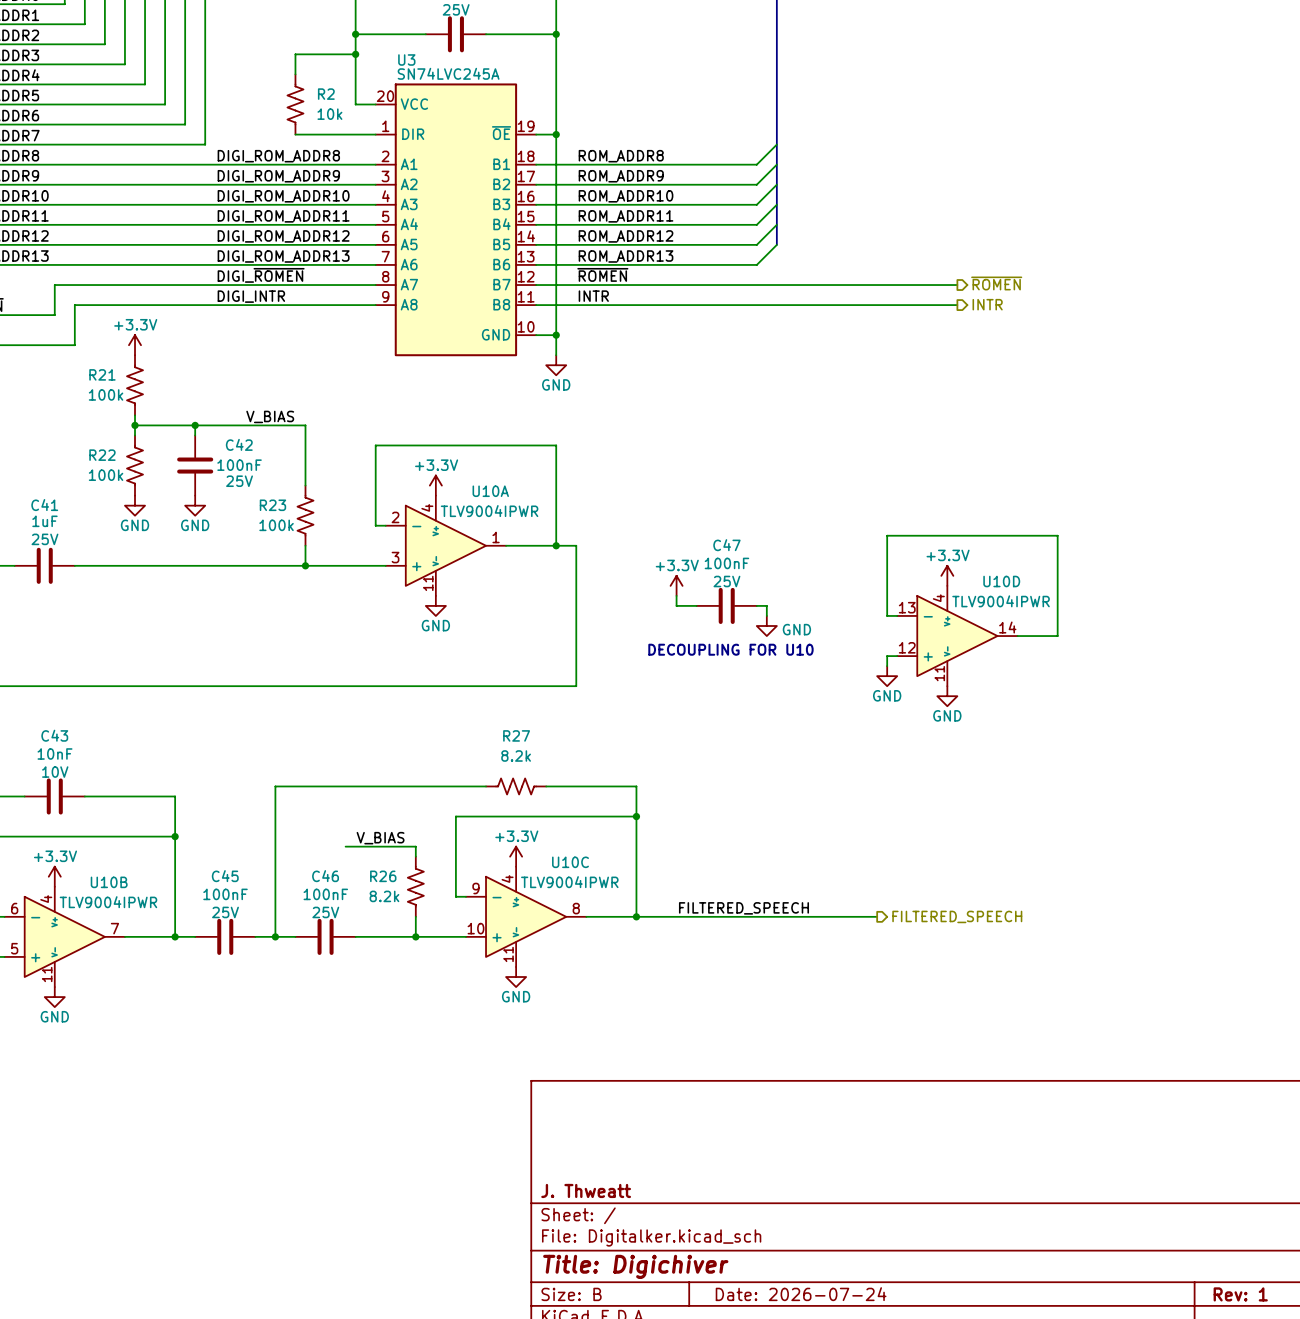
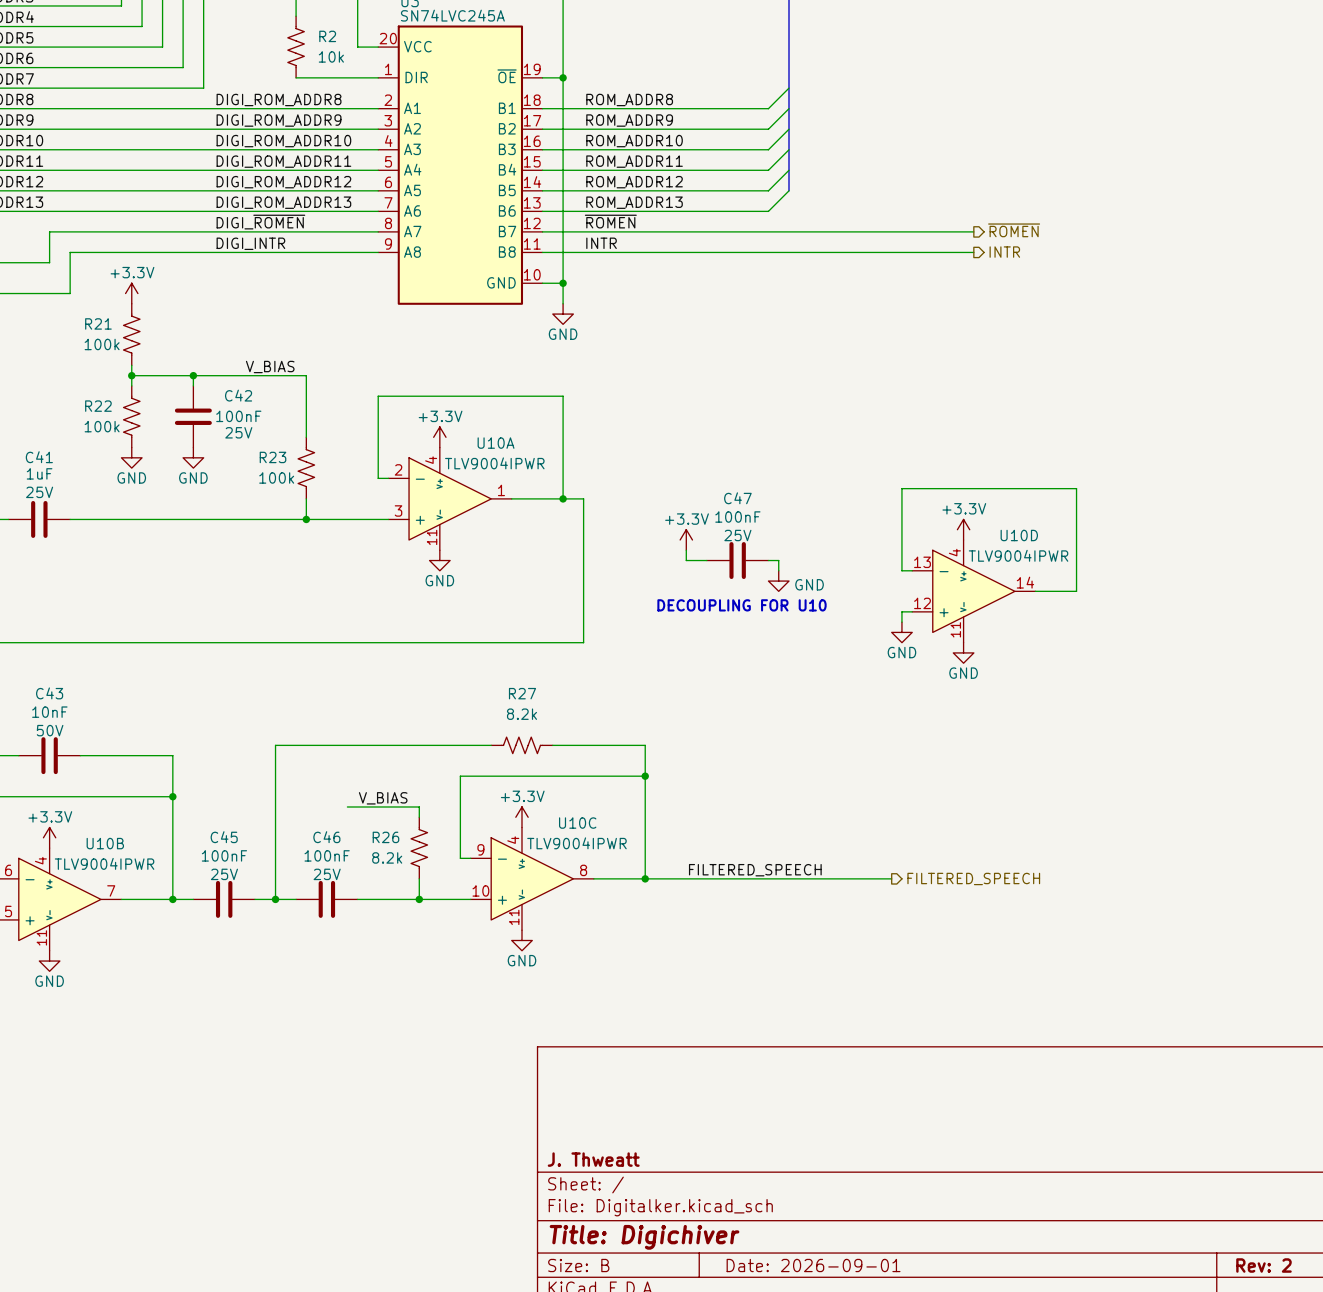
C43 text: 10V (55, 772) -> 50V (50, 730)
title block: Date: 2026-07-24 (801, 1294) -> Date: 2026-09-01 (813, 1265)
title block: Rev: 1 (1240, 1294) -> Rev: 2 (1263, 1265)

